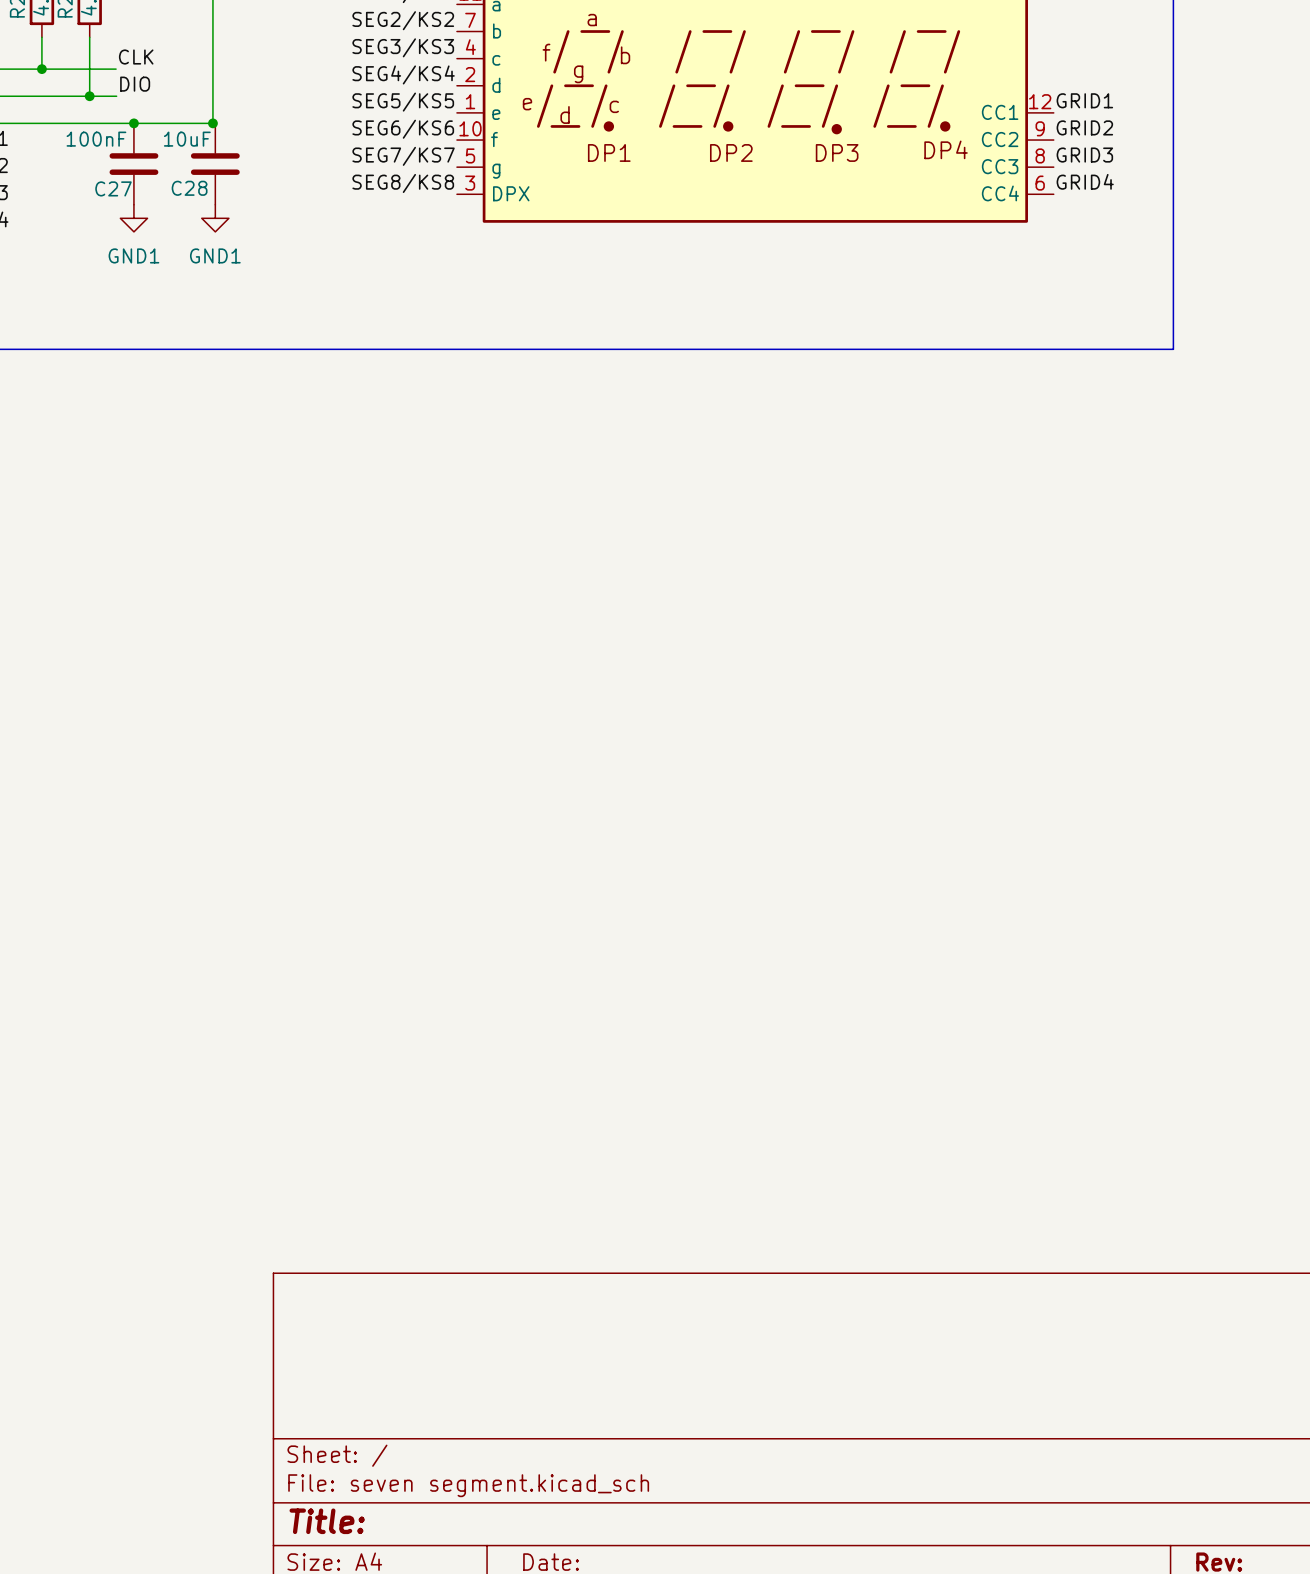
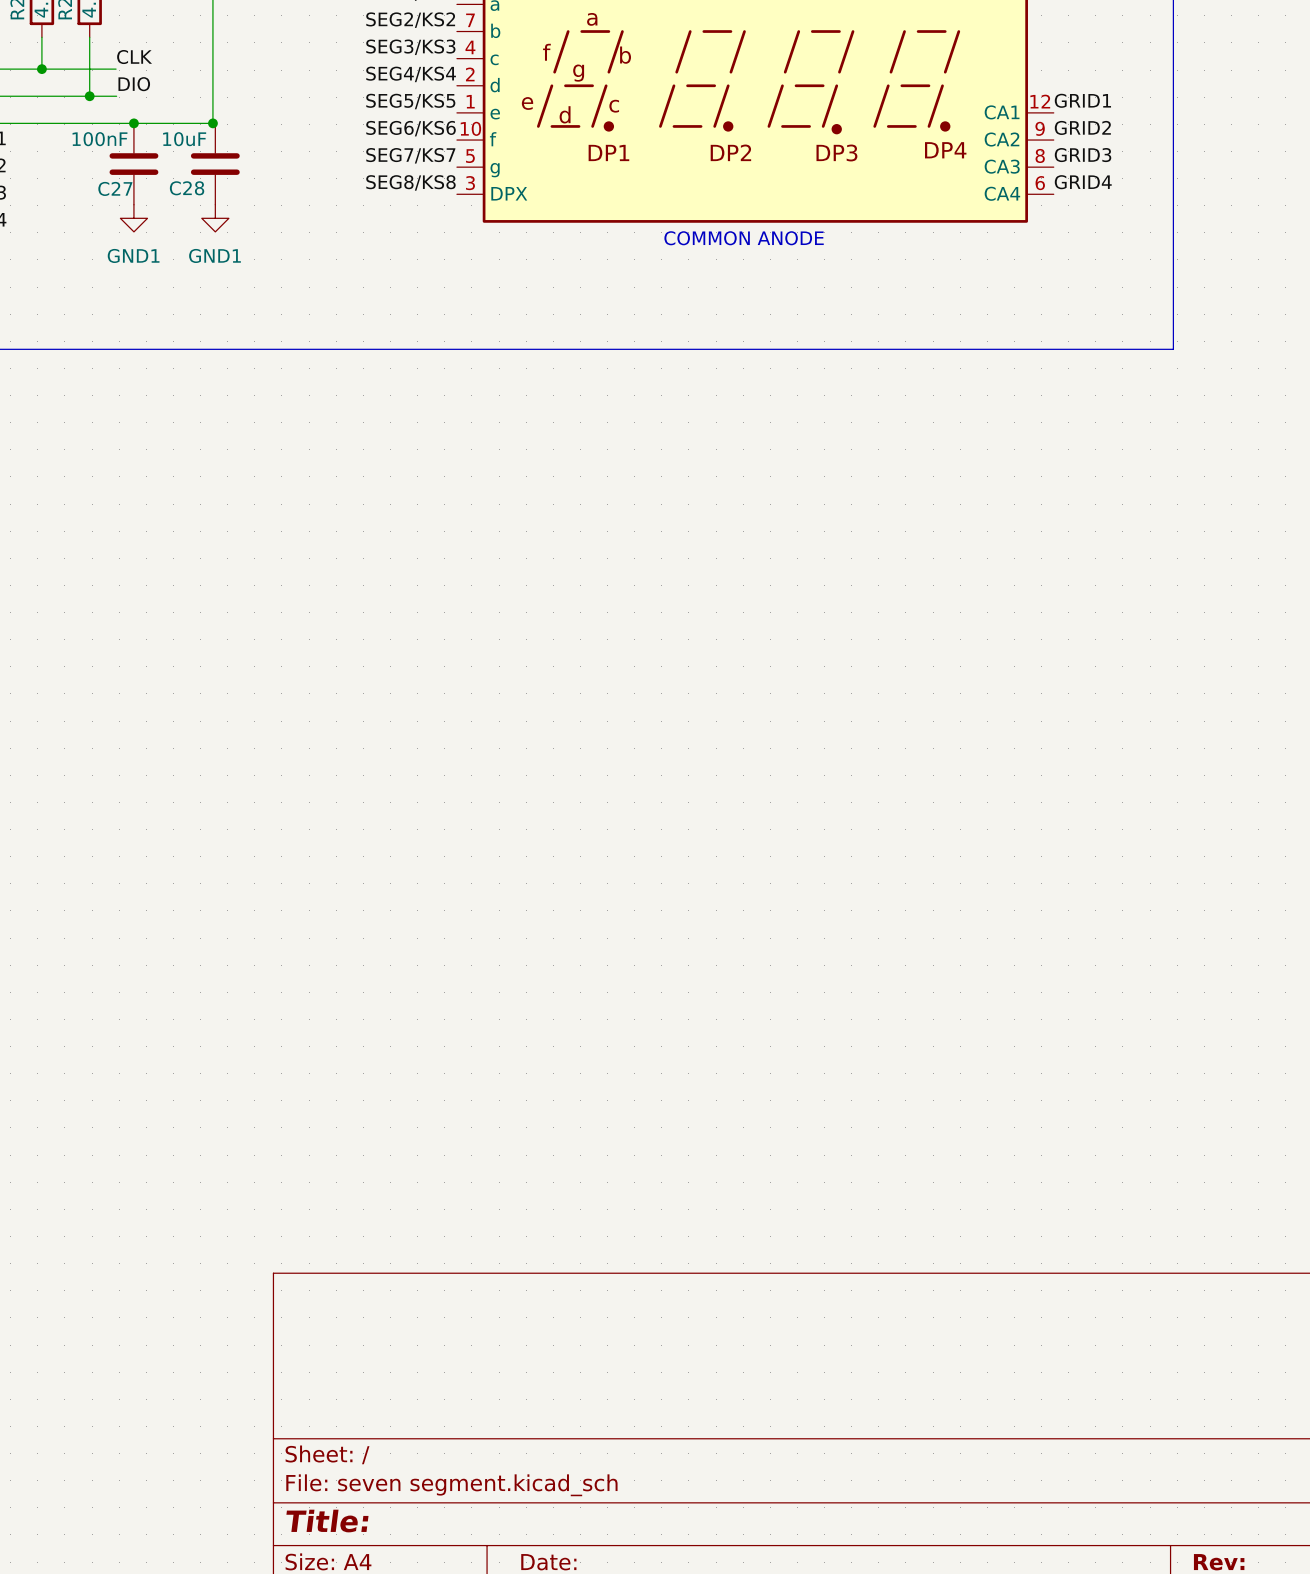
part pin name: CC1 (1000, 112) -> CA1 (1002, 112)
part pin name: CC2 (1000, 139) -> CA2 (1002, 139)
part pin name: CC3 (1000, 166) -> CA3 (1002, 166)
part pin name: CC4 (1000, 193) -> CA4 (1002, 193)
text: none -> COMMON ANODE (744, 238)

